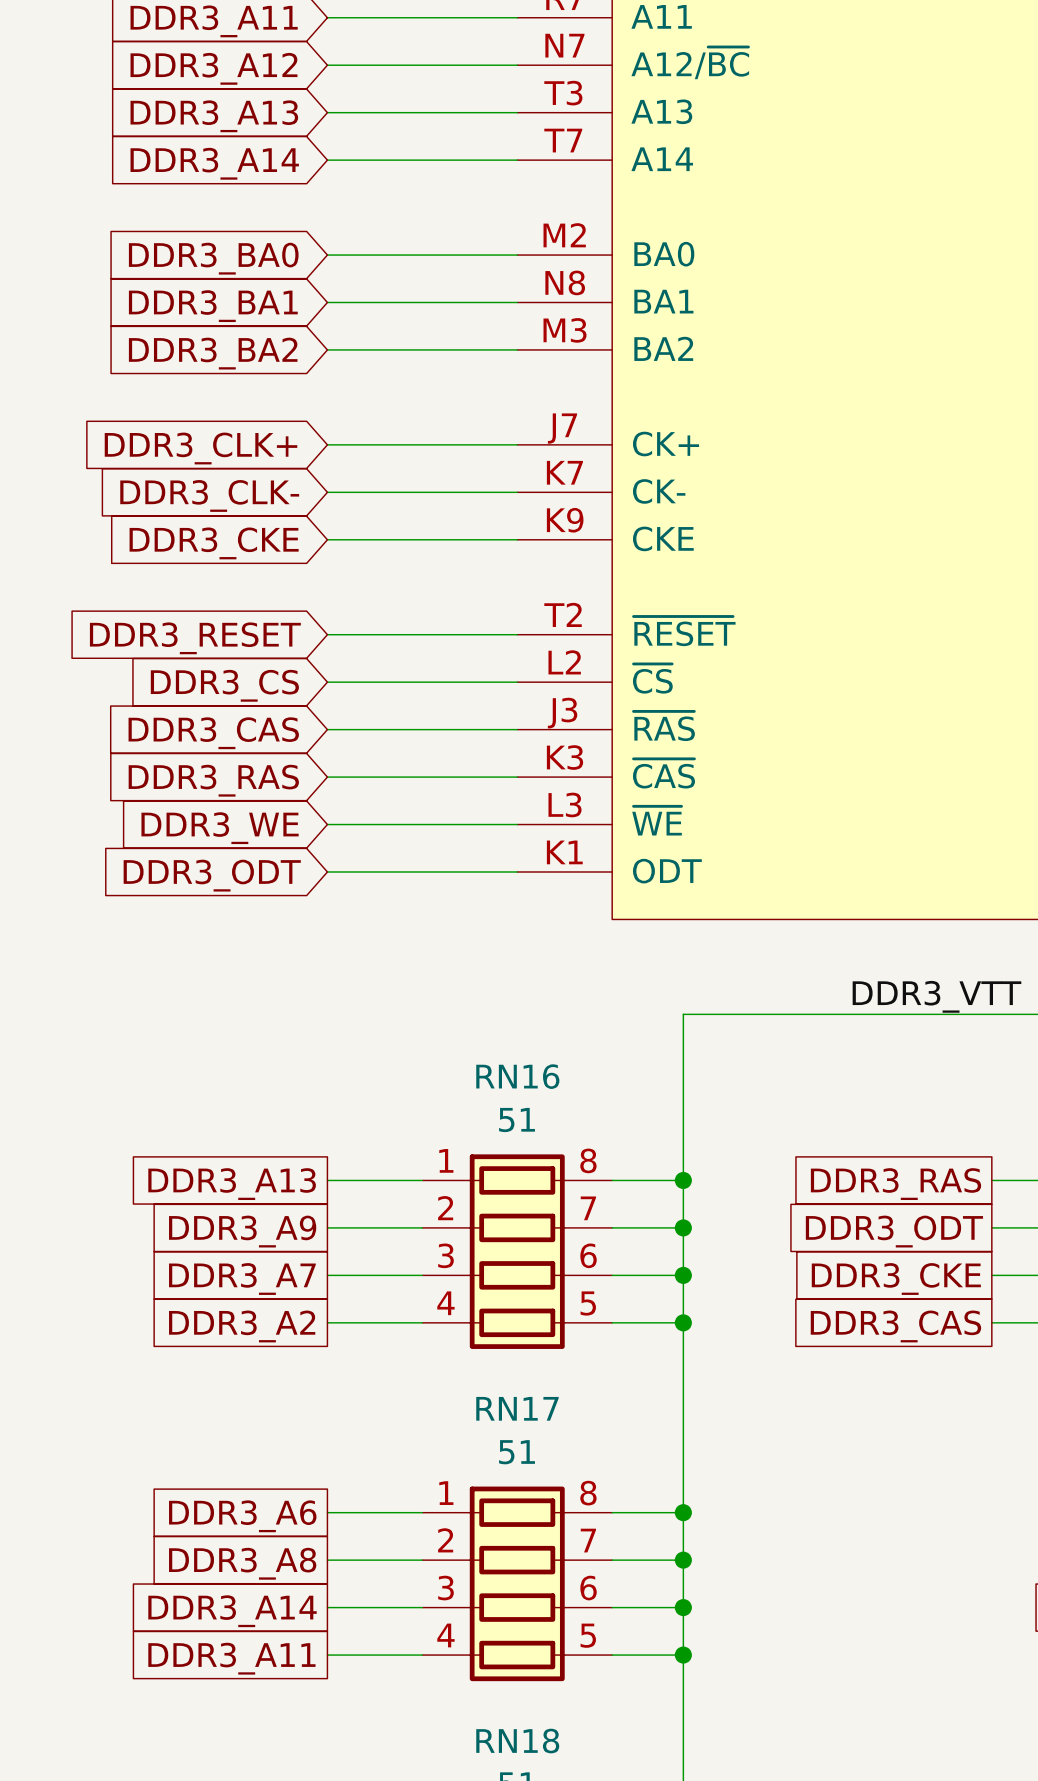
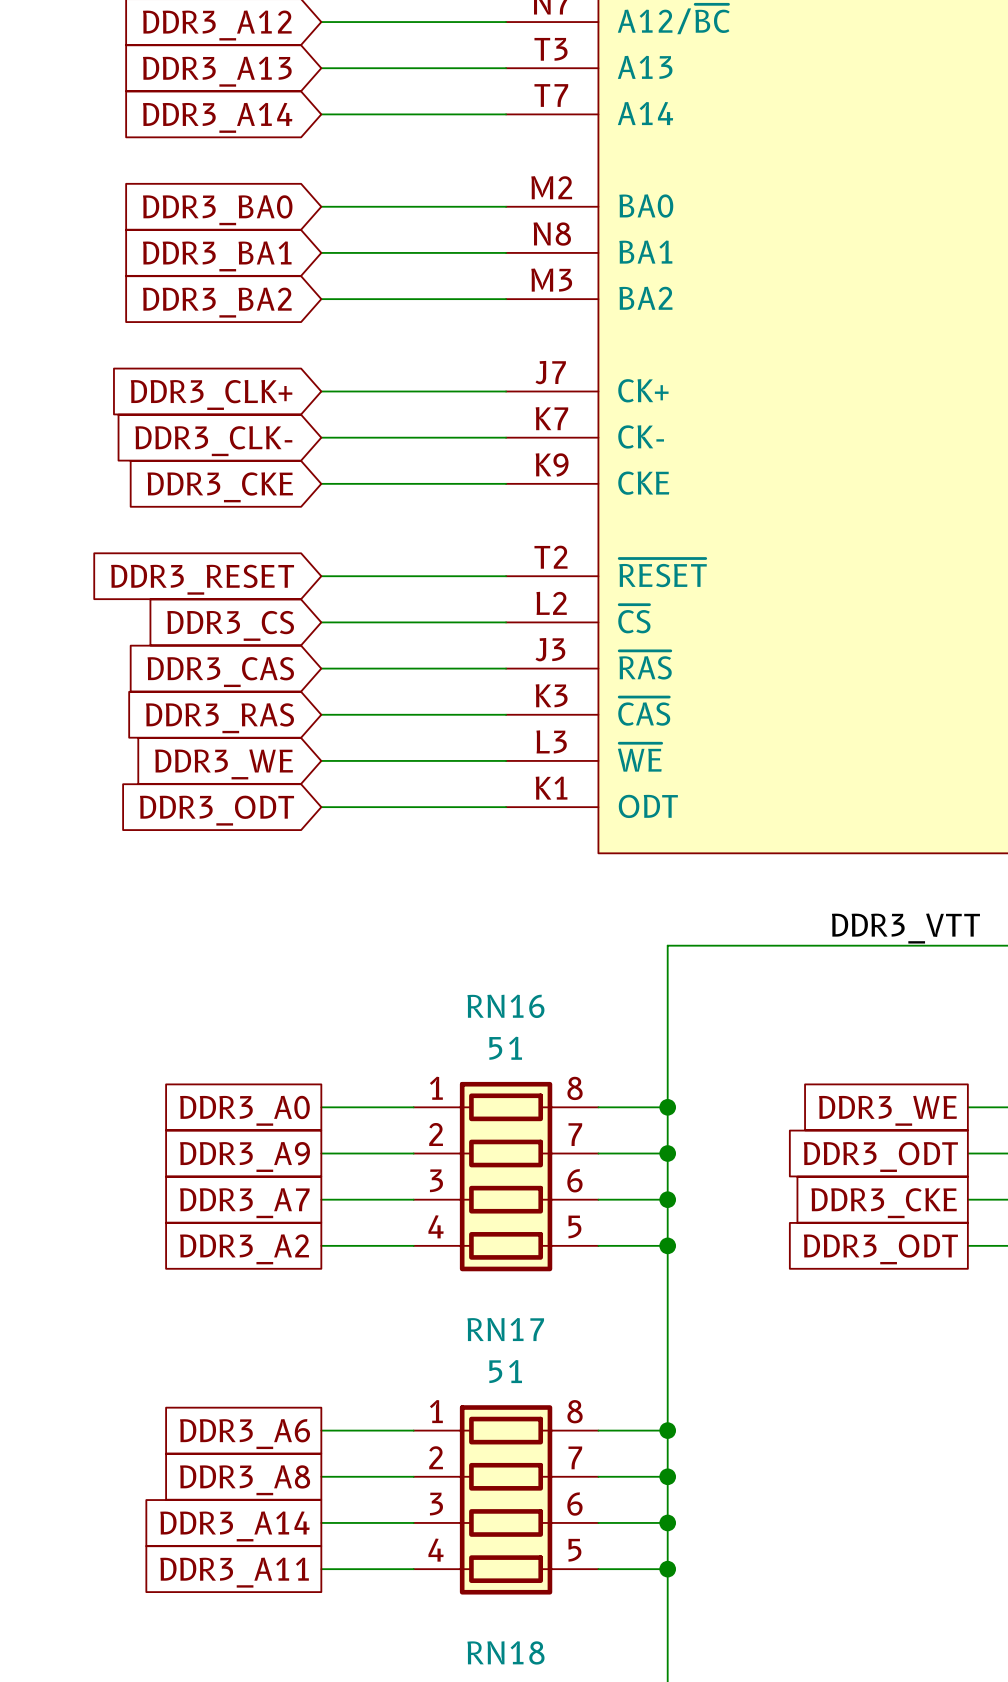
global label: DDR3_A13 (232, 1184) -> DDR3_A0 (244, 1110)
global label: DDR3_RAS (896, 1184) -> DDR3_WE (887, 1110)
global label: DDR3_CAS (895, 1326) -> DDR3_ODT (880, 1249)

